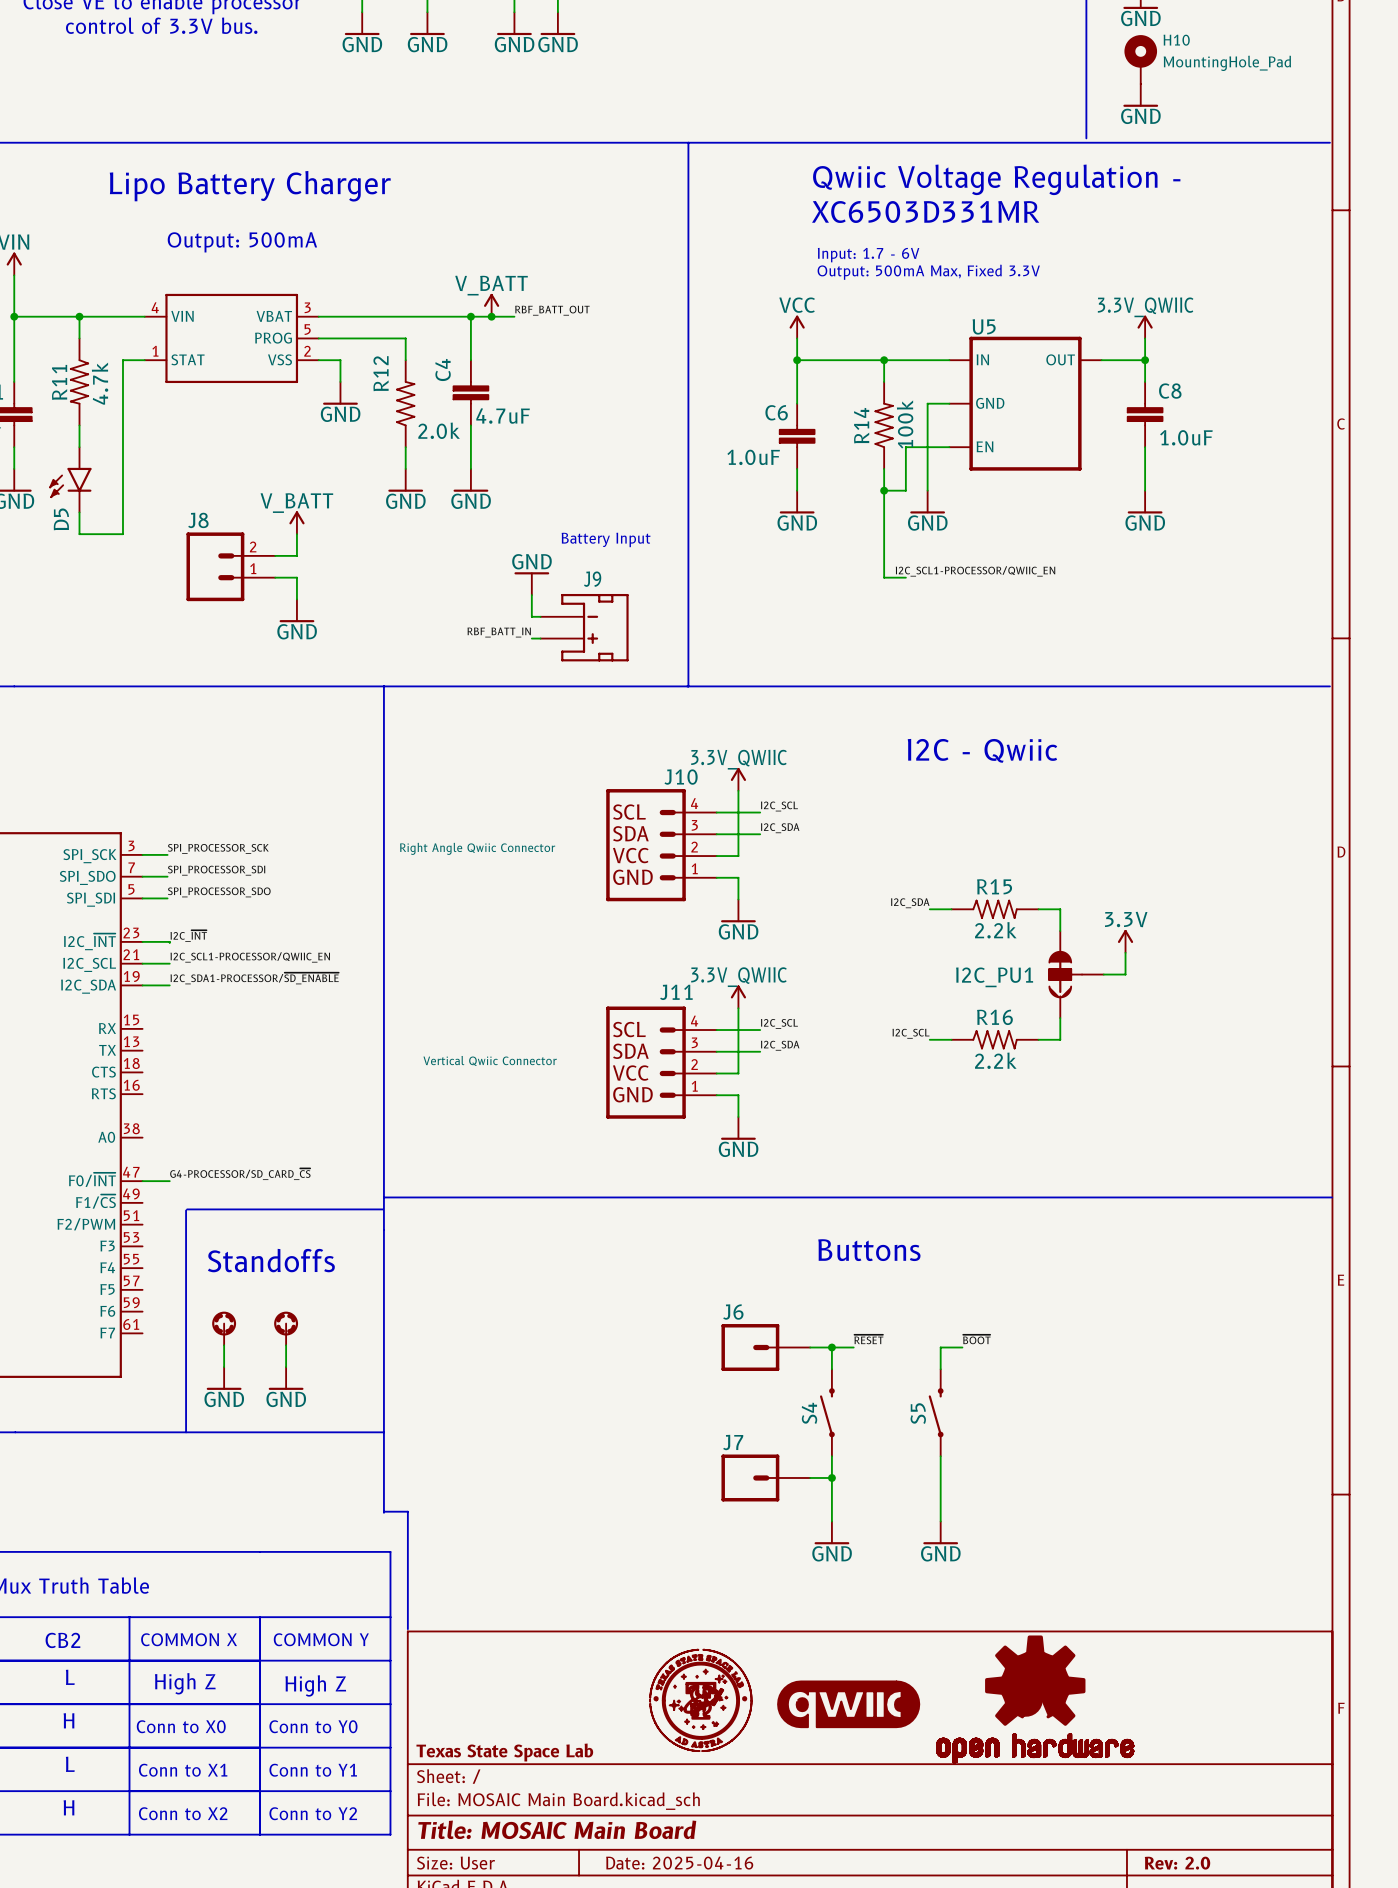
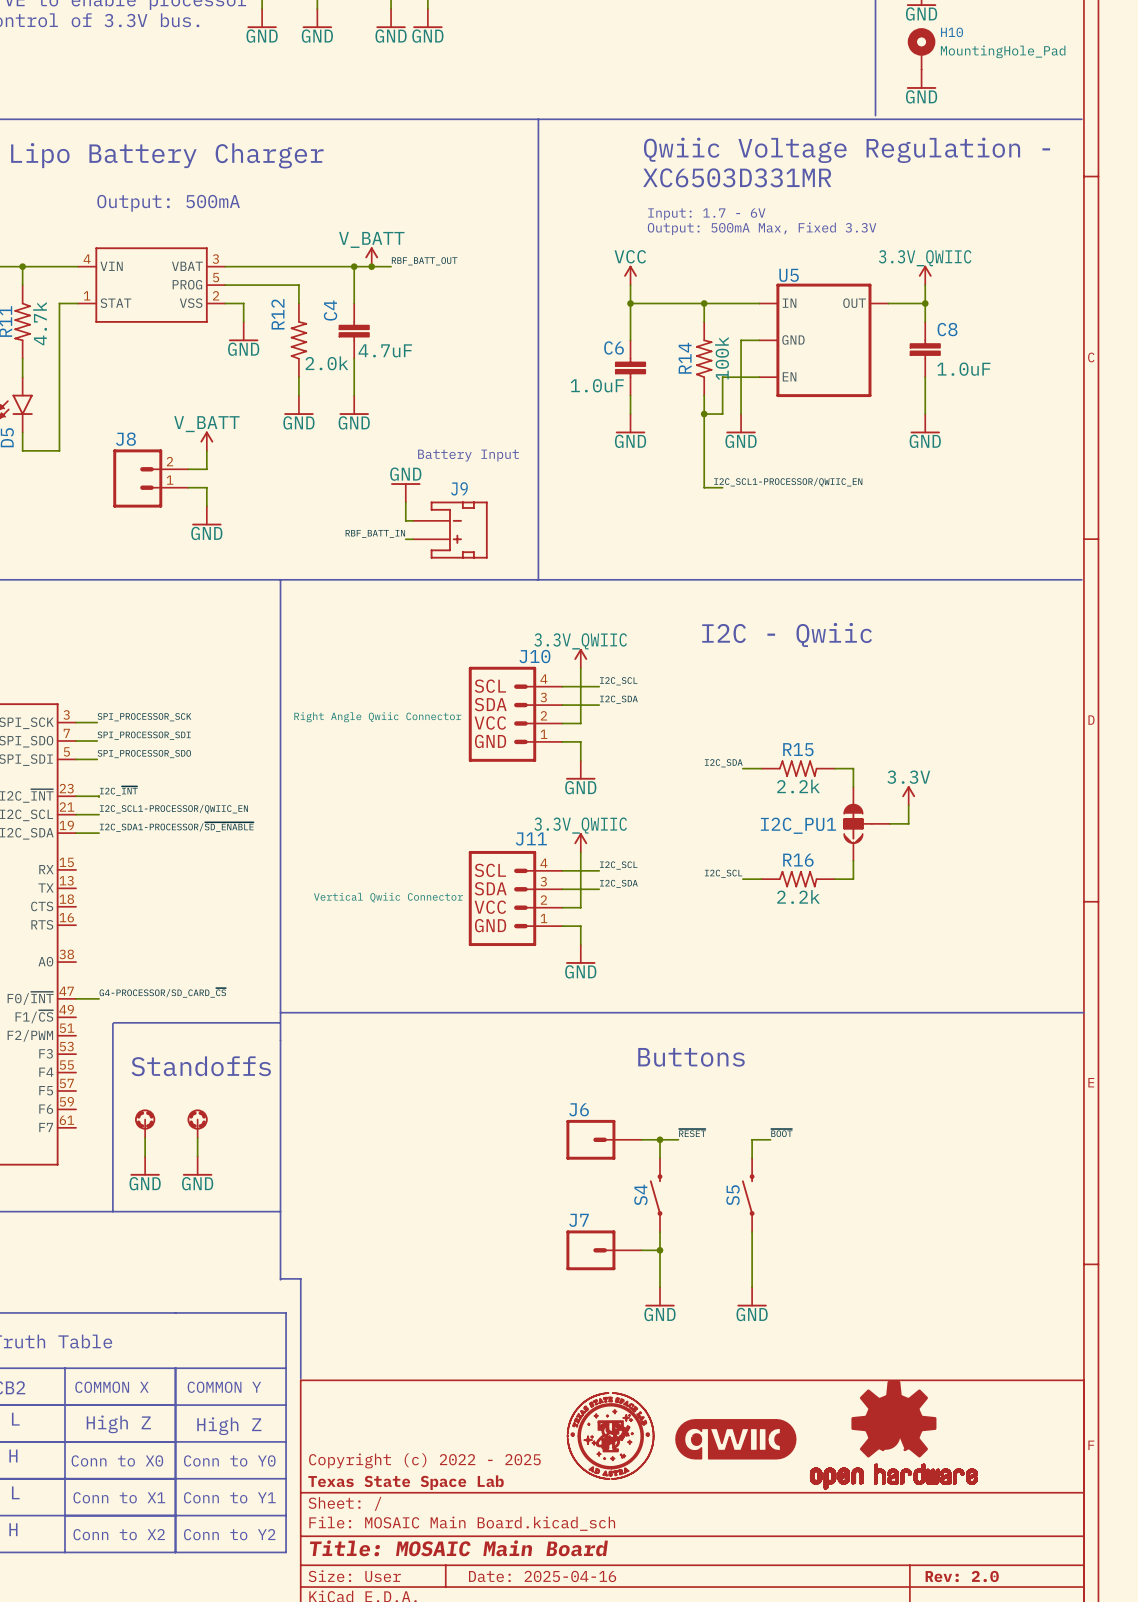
part position: (1035, 1699) -> (893, 1434)
power symbol position: (700, 1700) -> (610, 1435)
part position: (848, 1704) -> (735, 1439)
title block: none -> Copyright (c) 2022 - 2025 (424, 1460)

